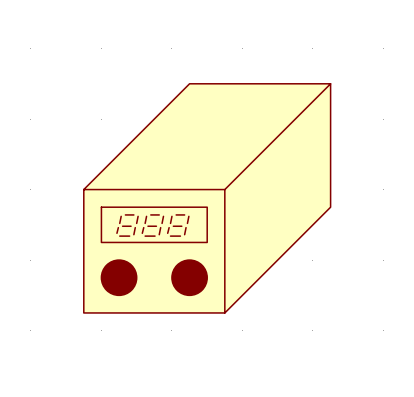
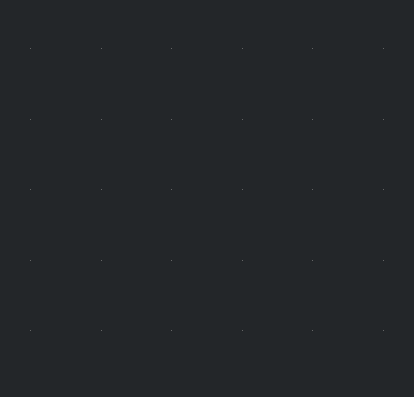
part: (207, 198) -> none

